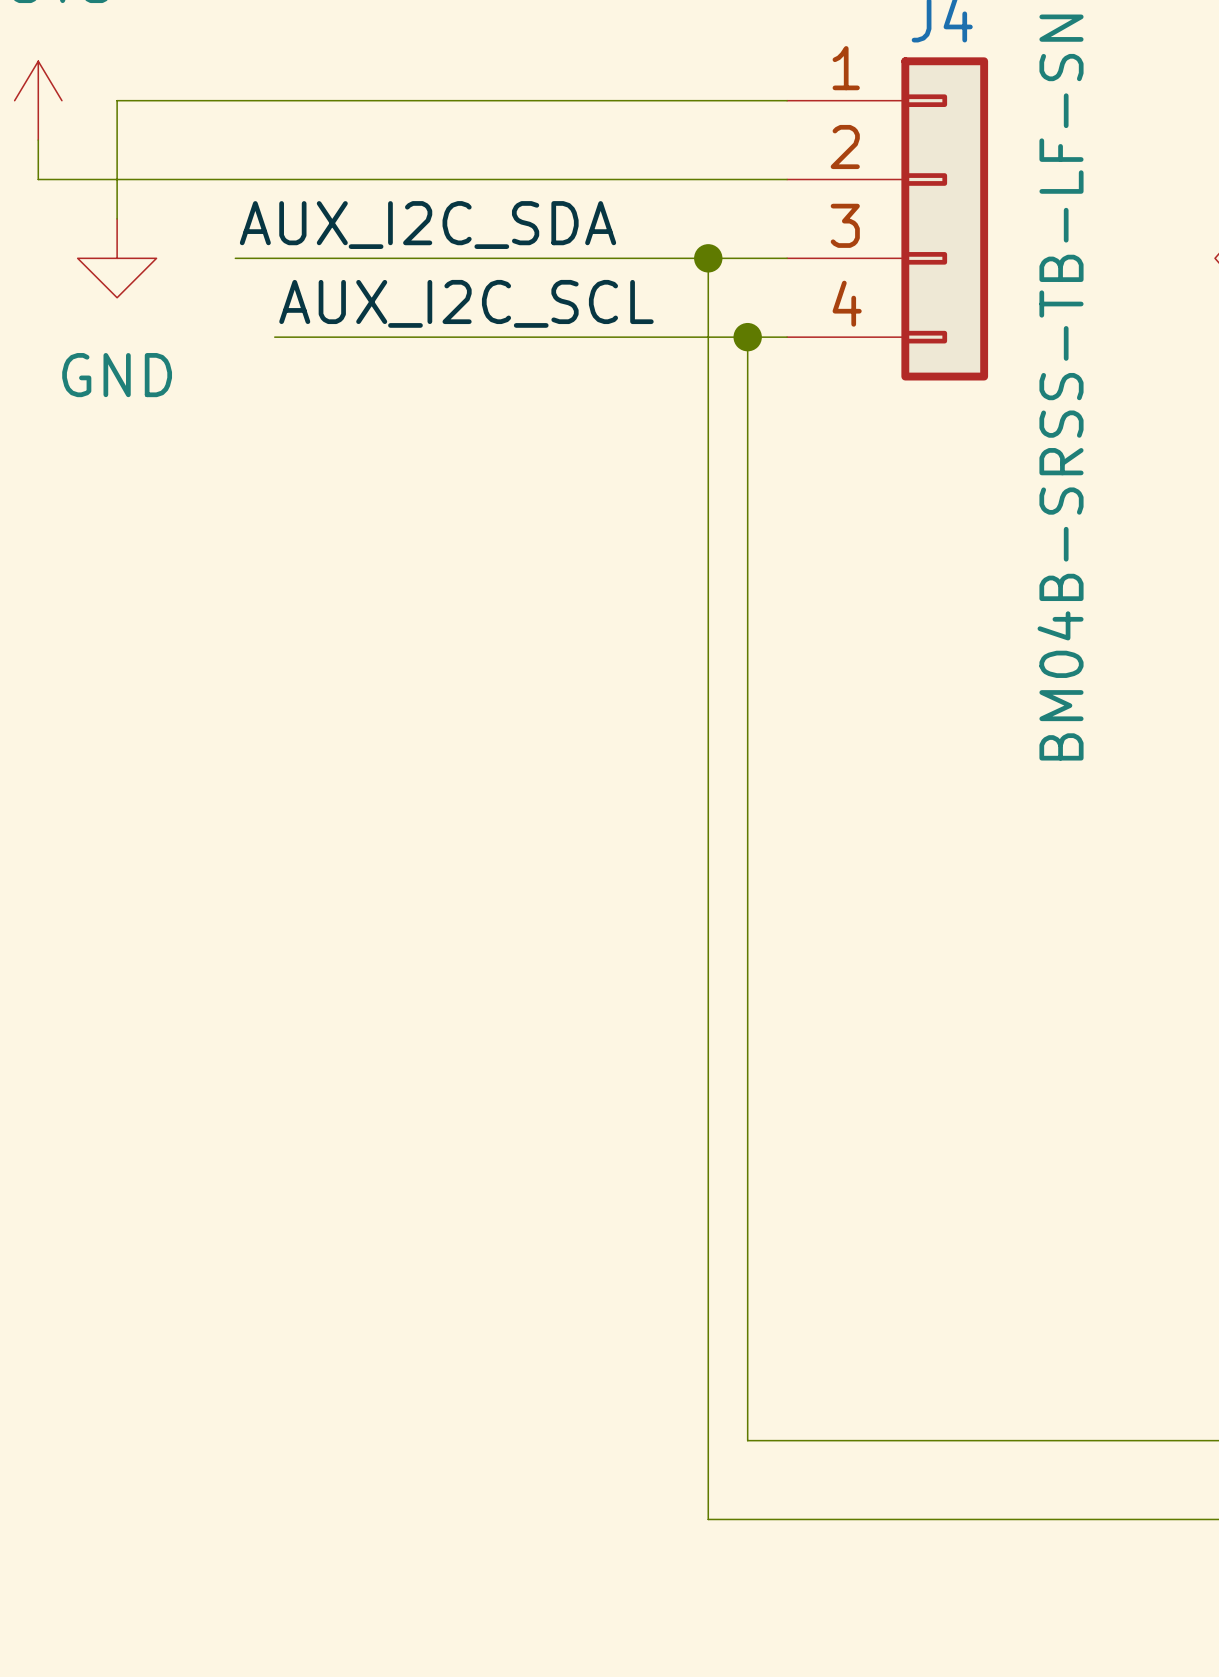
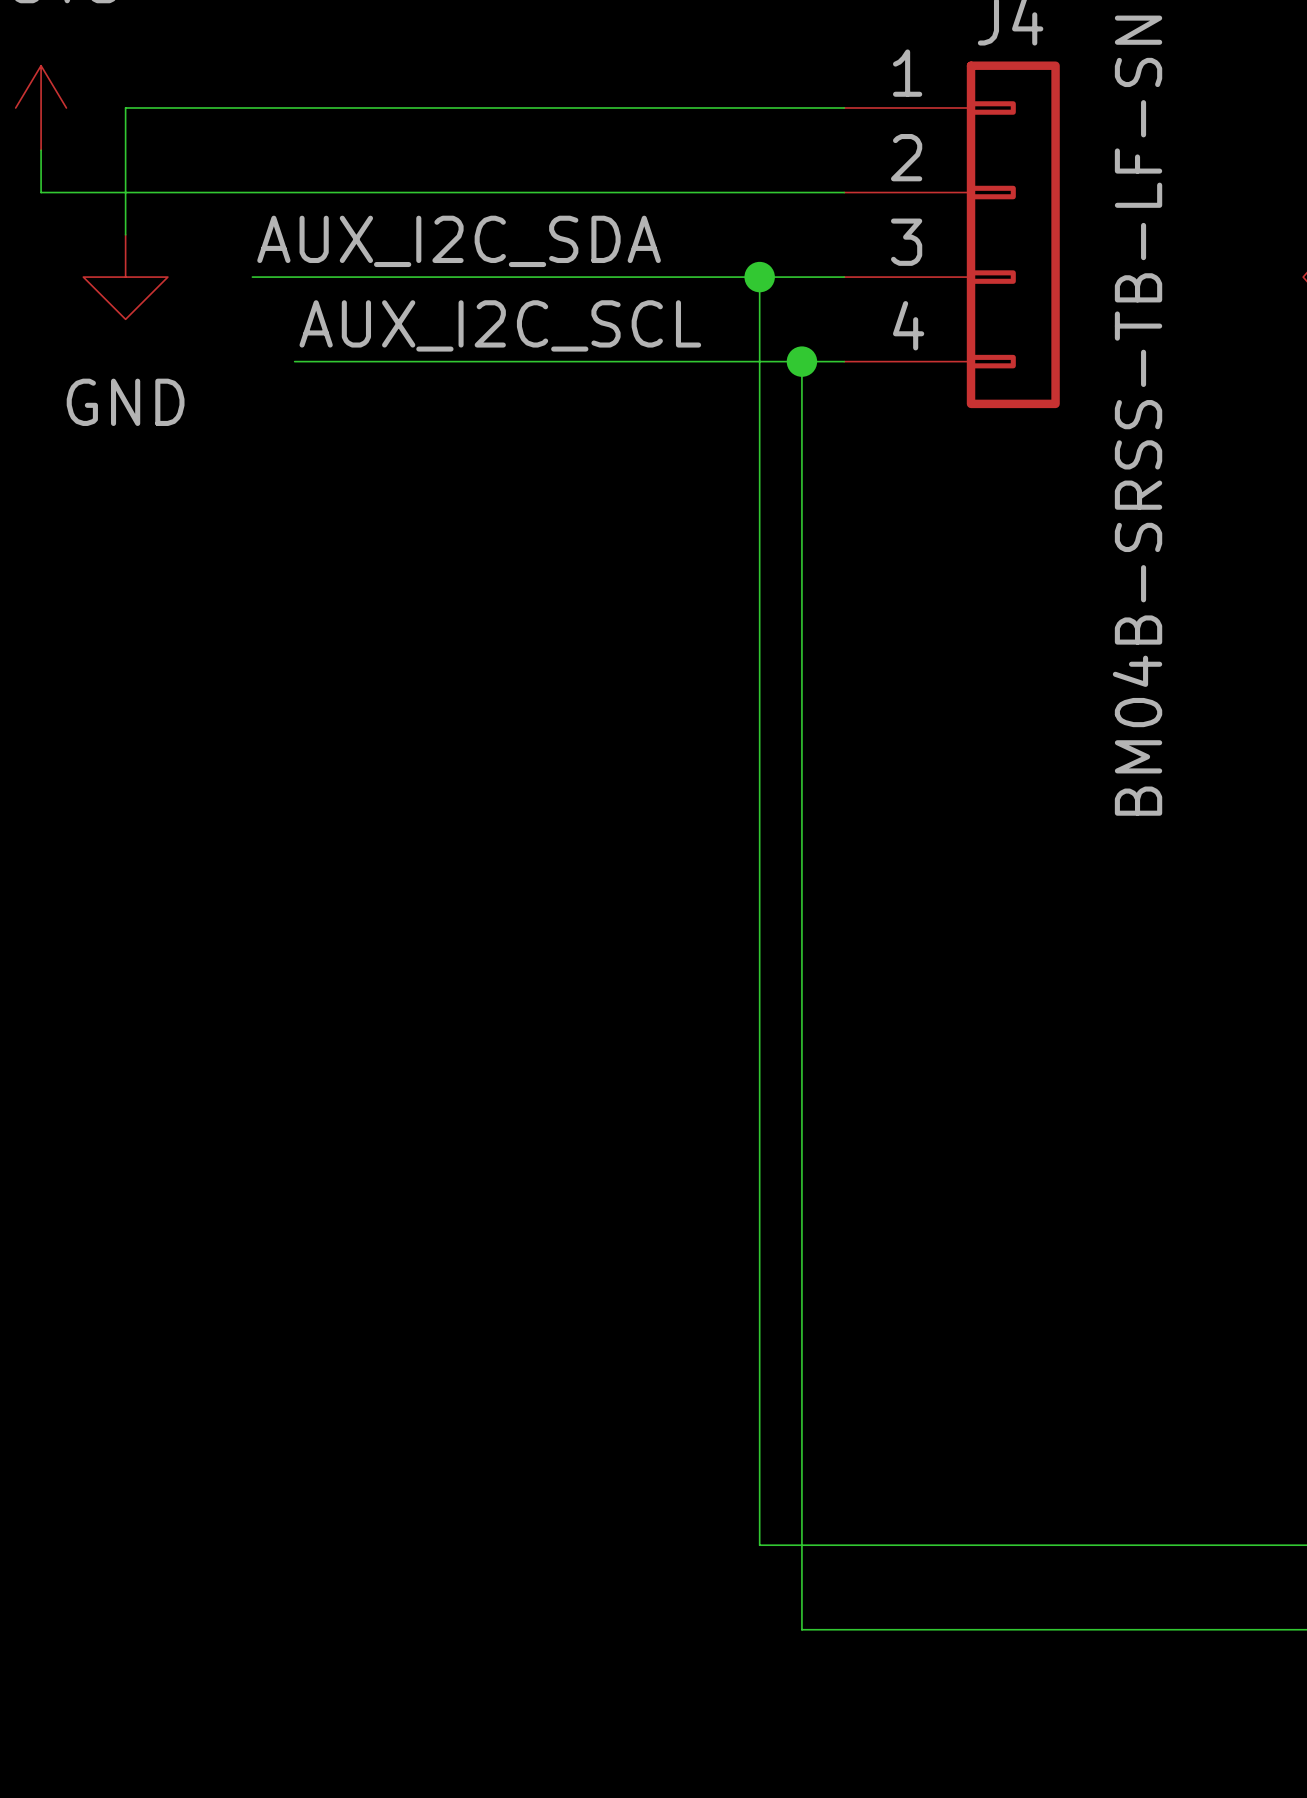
wire: (708, 1440) (708, 1519) (747, 1519) -> (759, 1545) (801, 1545) (801, 1629)

